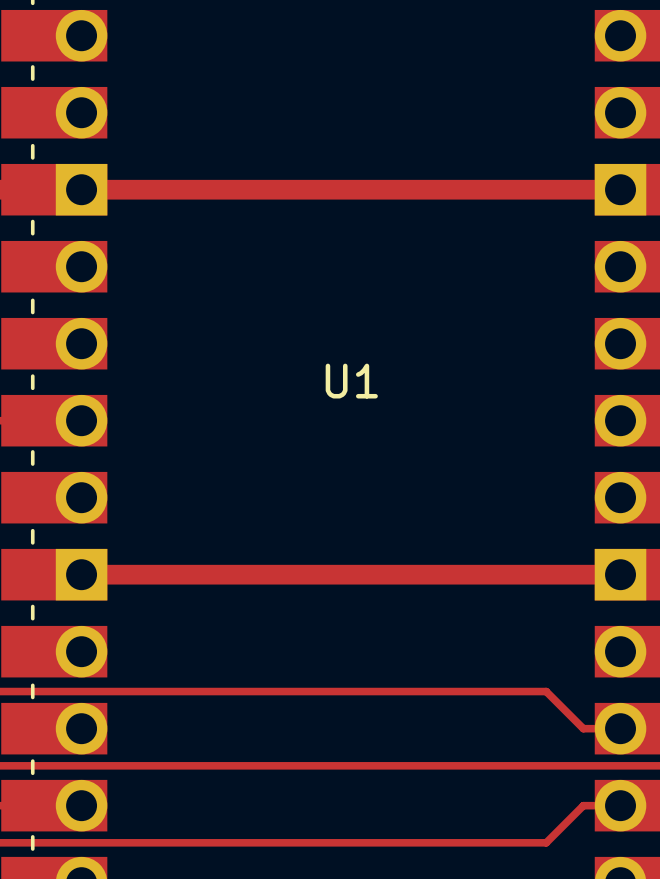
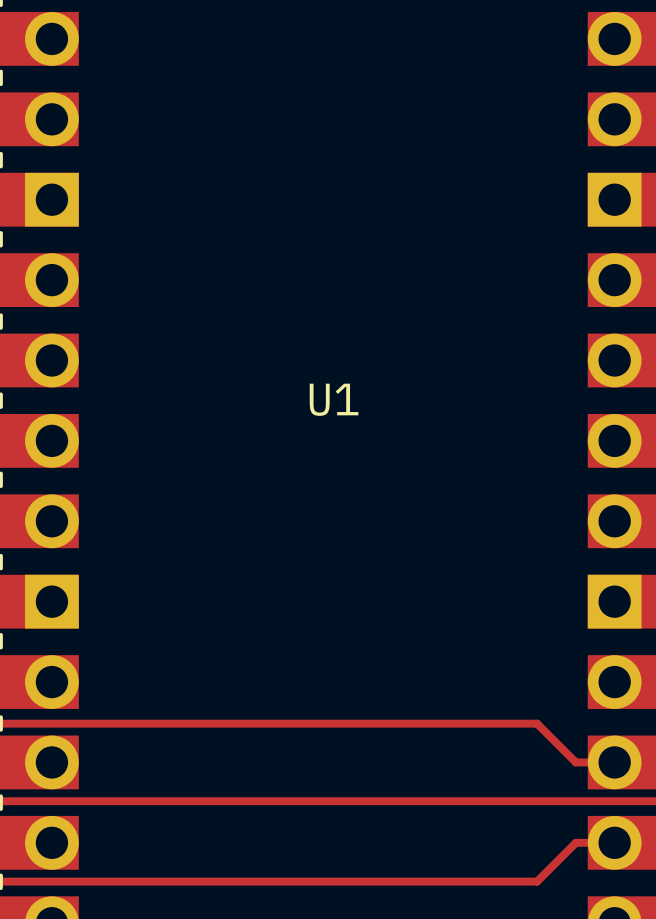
track: (81, 189) (620, 189) -> none
track: (81, 574) (620, 574) -> none

